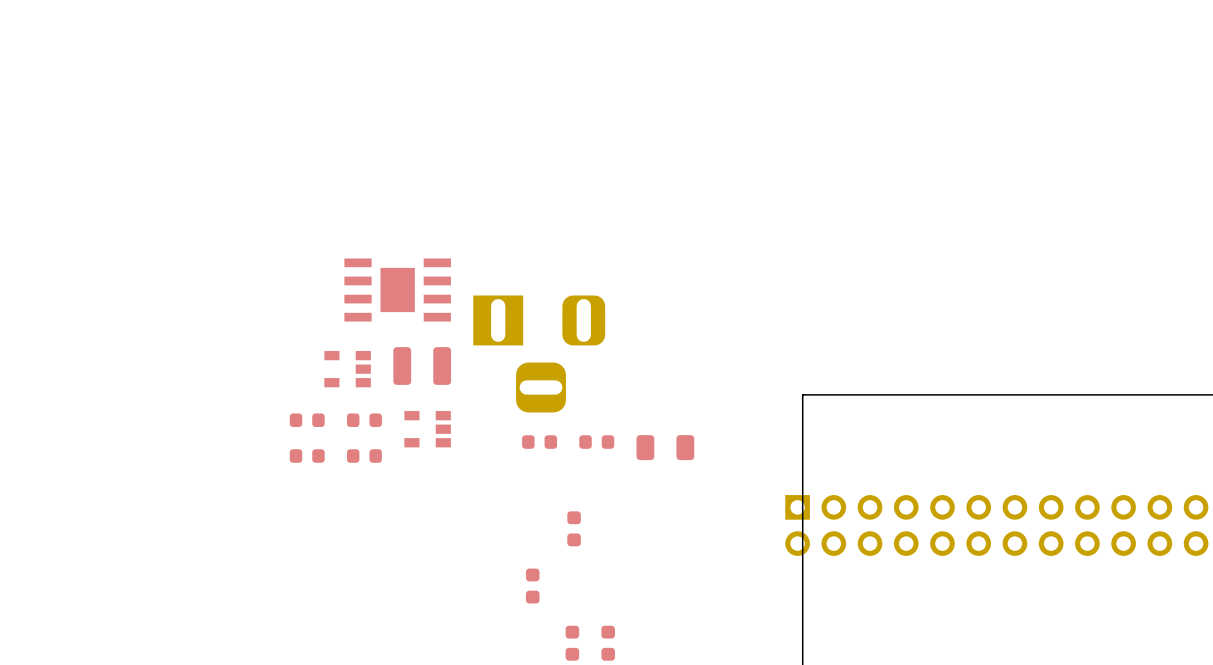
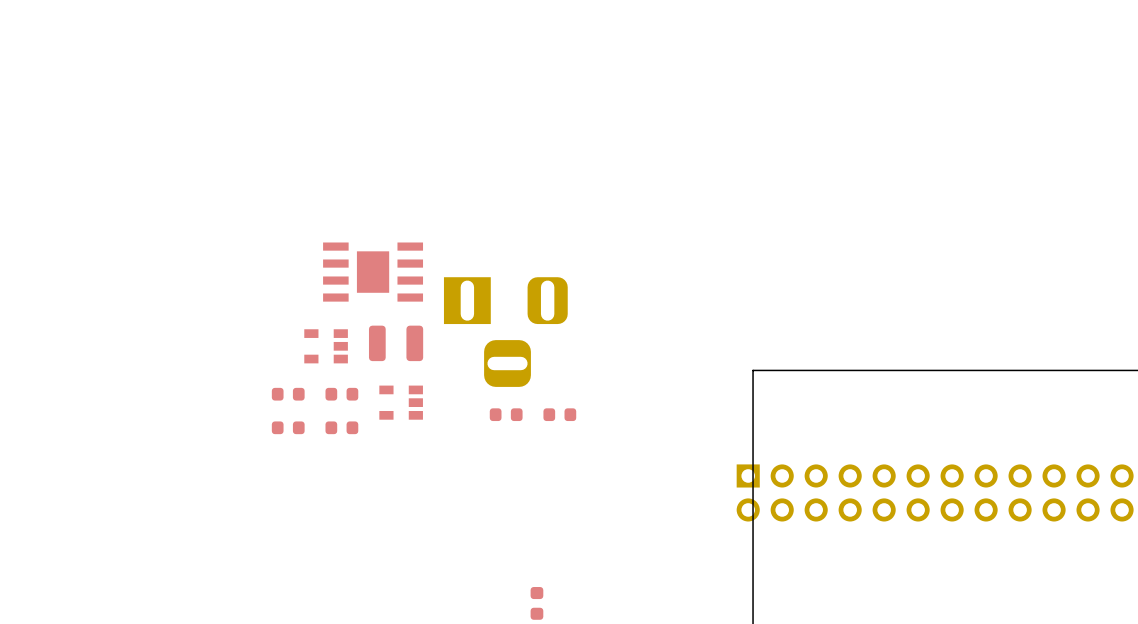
part: (665, 447) -> none
part: (574, 528) -> none
part: (532, 586) -> none
part: (608, 643) -> none

